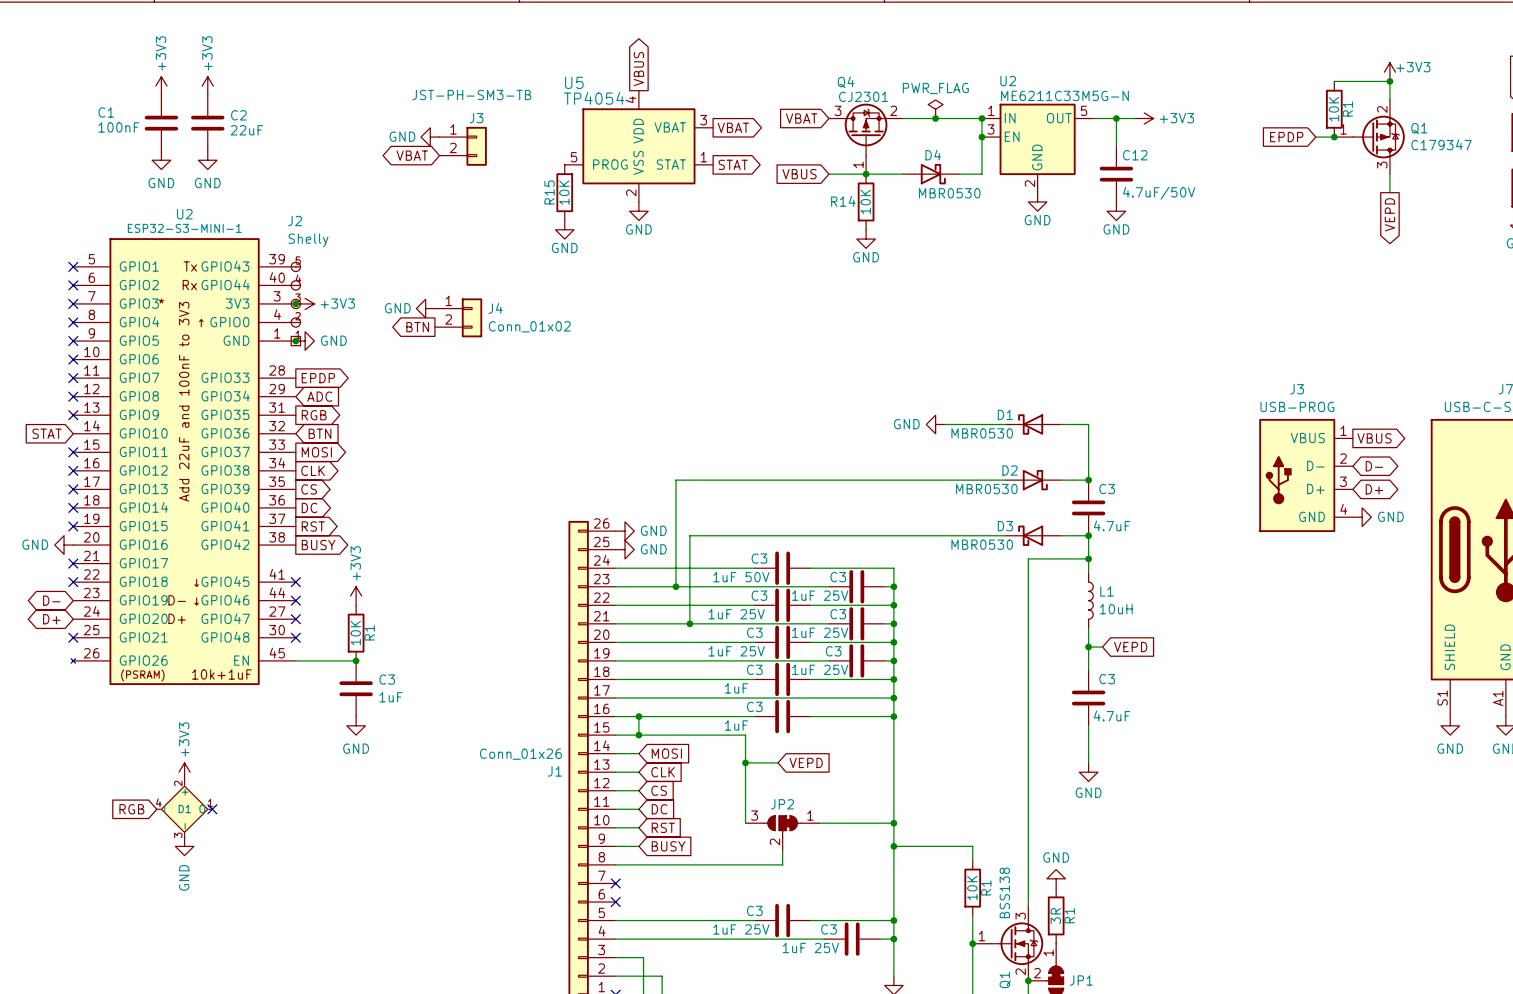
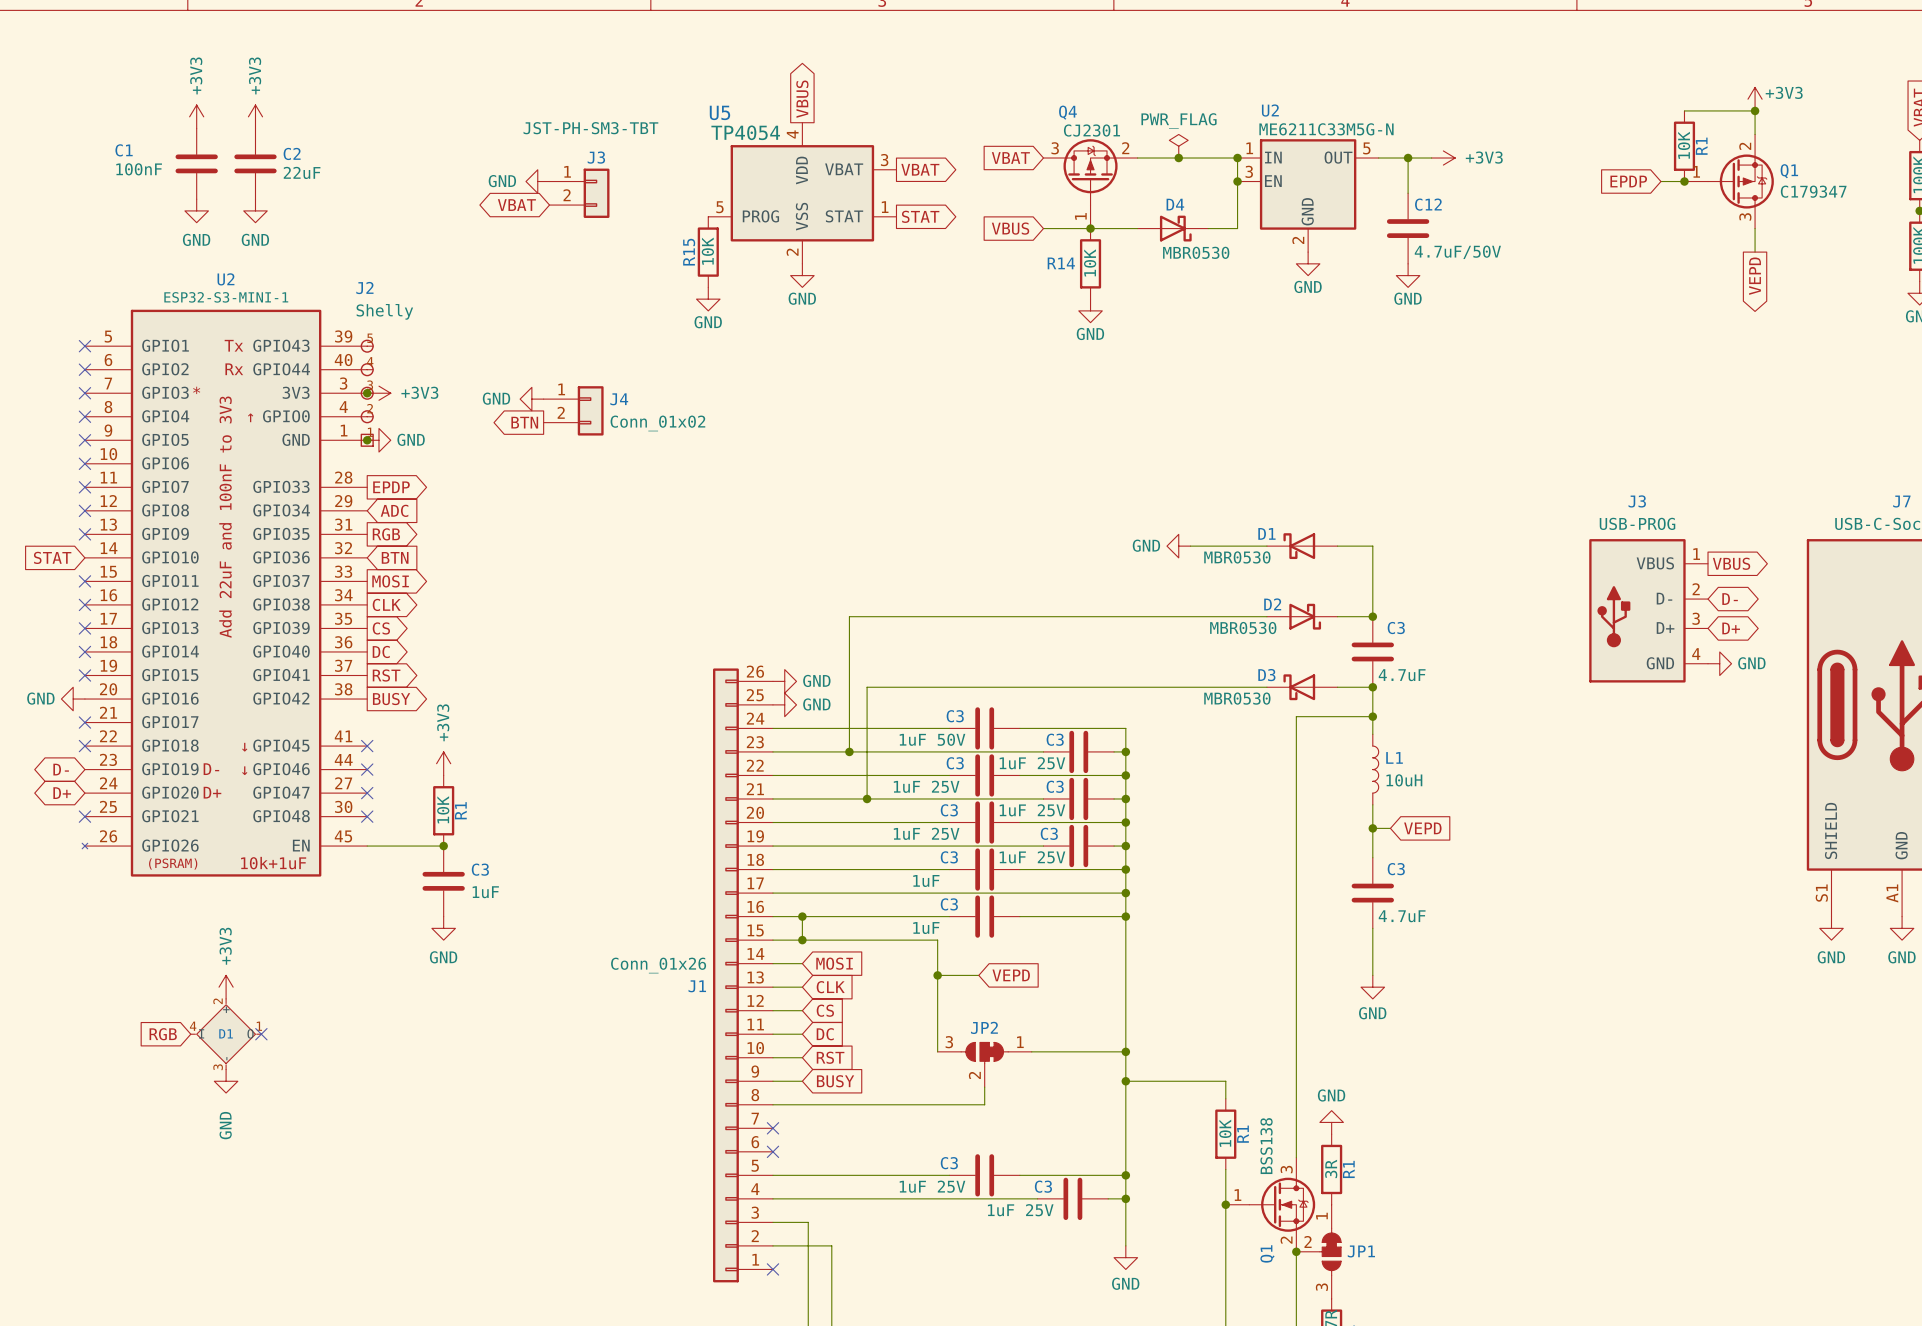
J3 value: JST-PH-SM3-TB (471, 94) -> JST-PH-SM3-TBT (590, 128)

